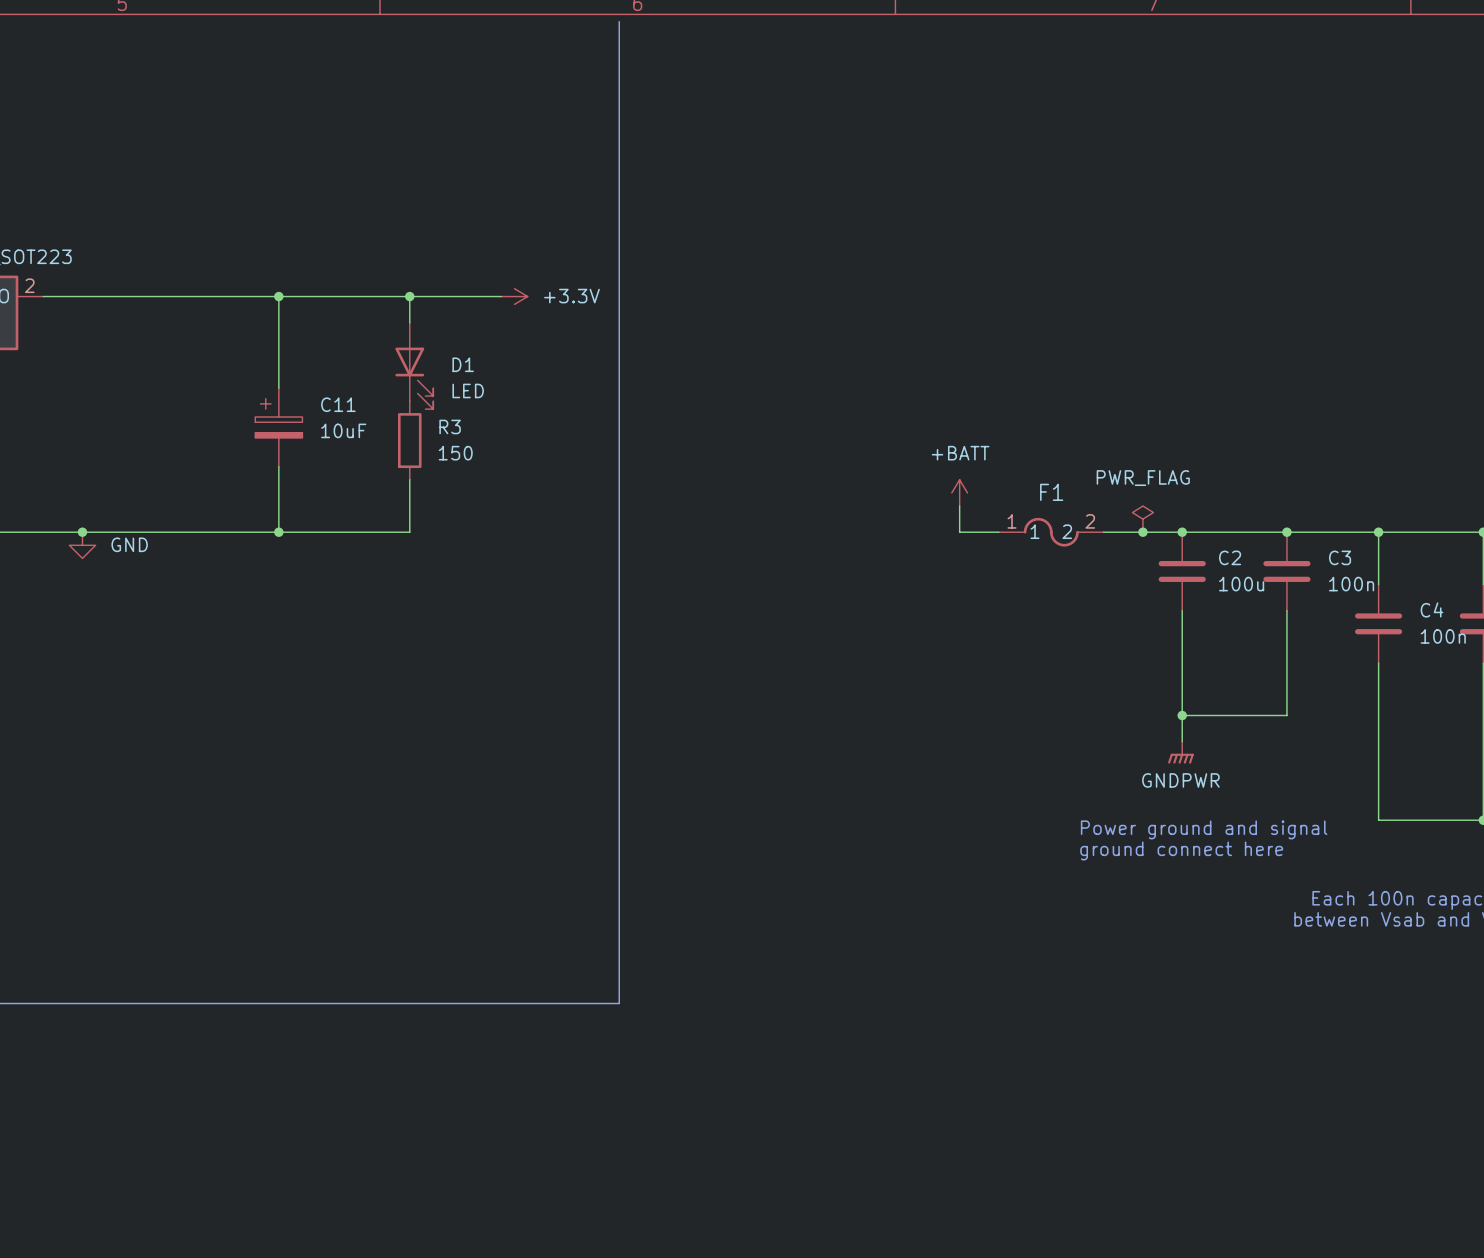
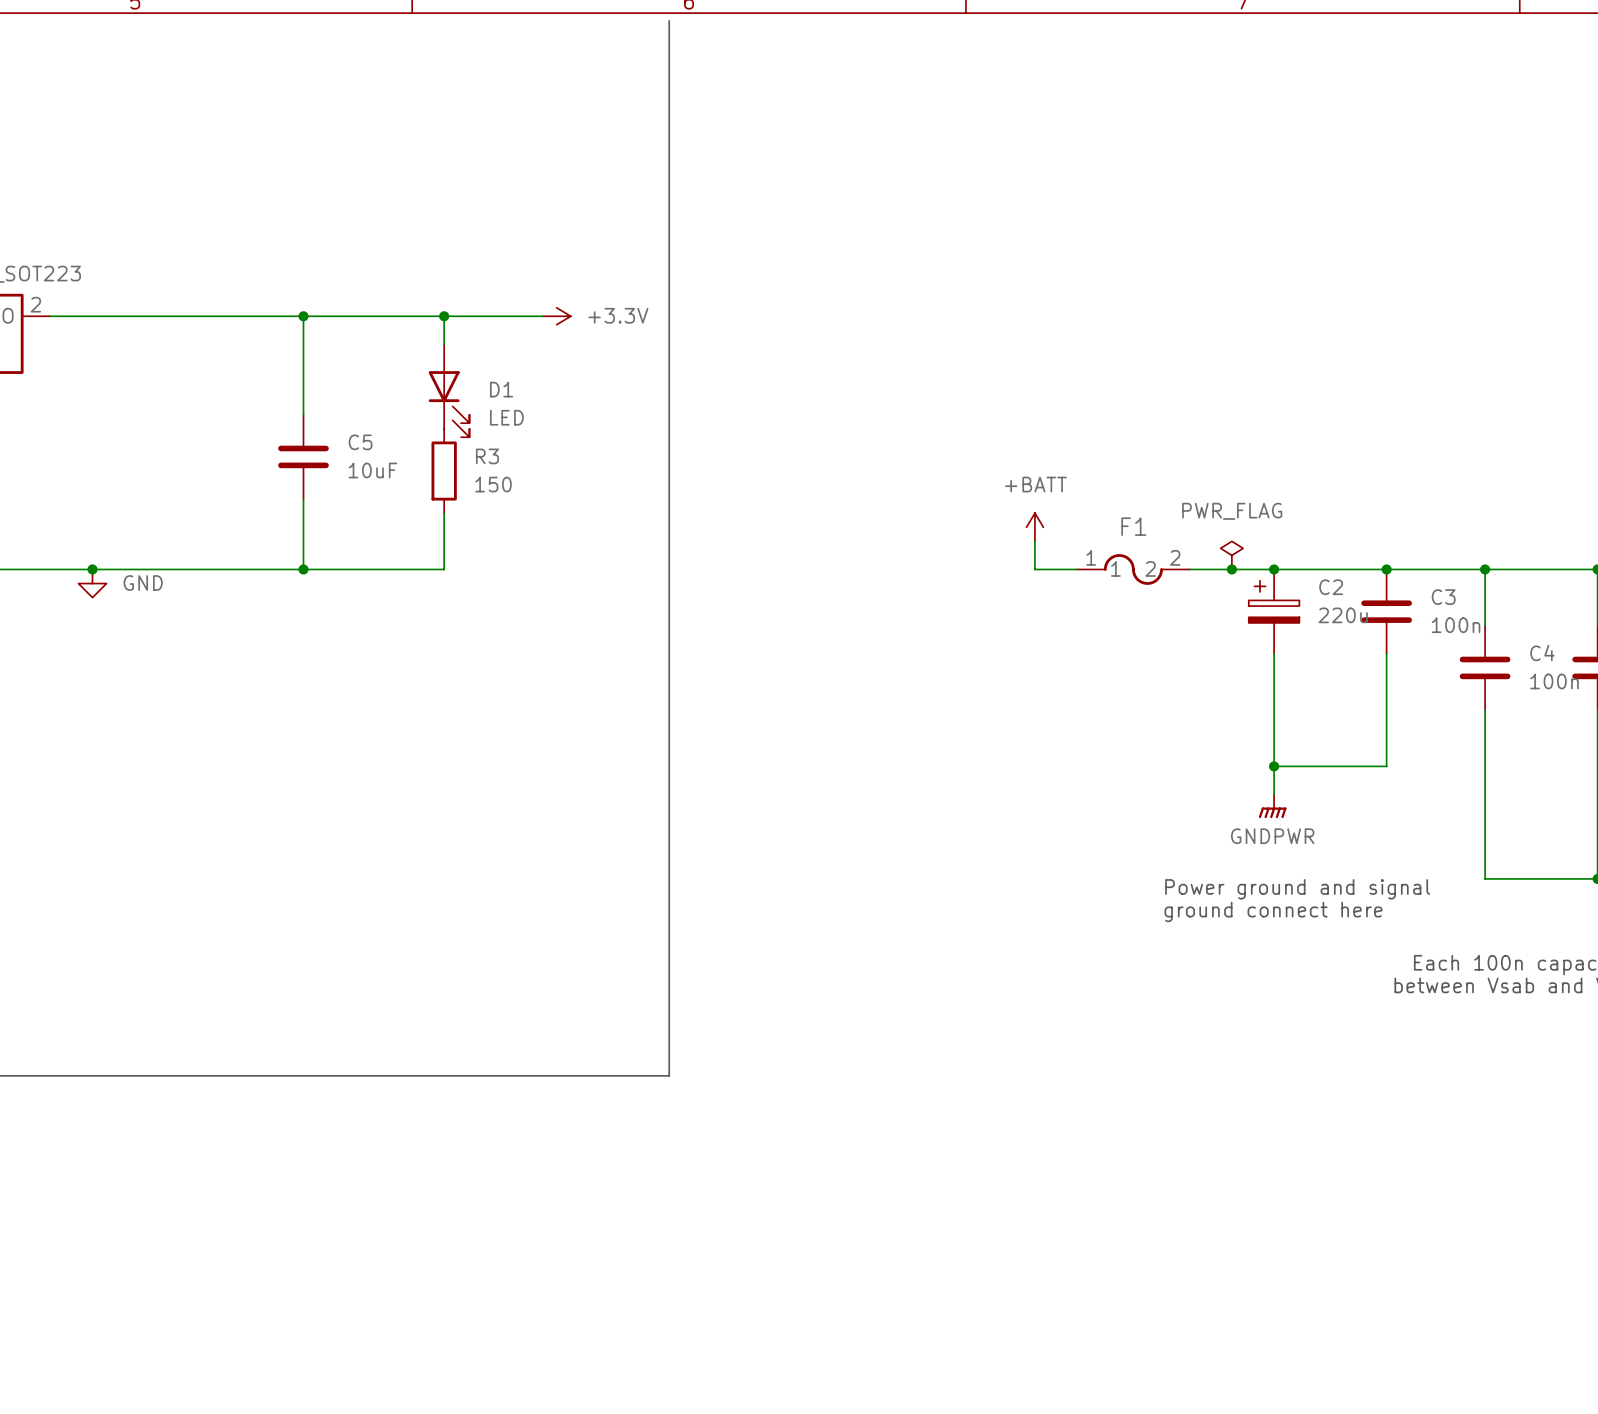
C11: 10uF (278, 427) -> none
C5: none -> 10uF (303, 456)
C2 symbol: [1158, 532, 1206, 611] -> [1248, 569, 1300, 654]
C2 value: 100u (1241, 584) -> 220u (1343, 615)

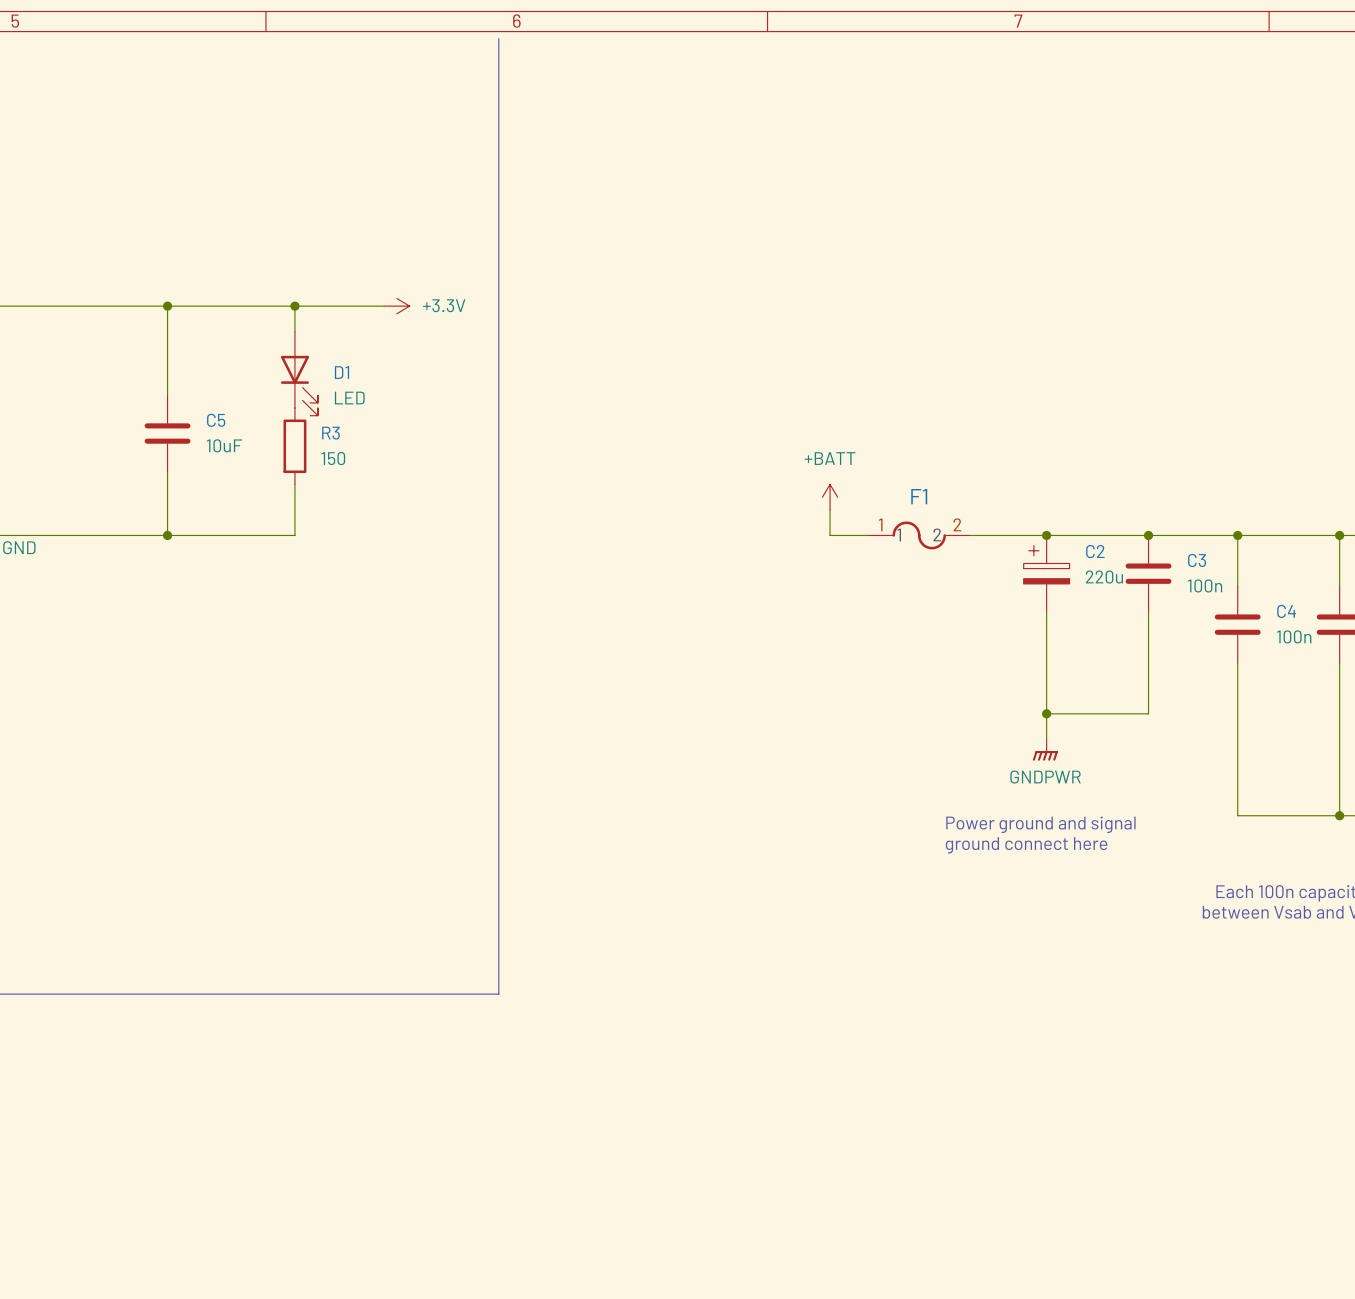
power symbol: PWR_FLAG (1231, 555) -> none
junction: (1231, 569) -> none

